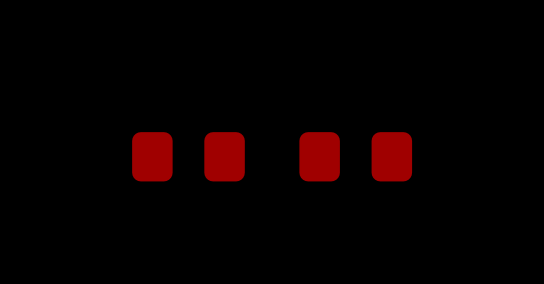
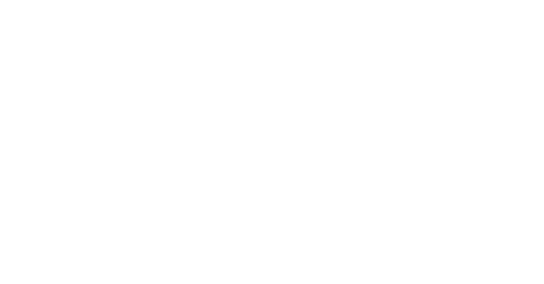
part: (188, 156) -> none
part: (355, 156) -> none

